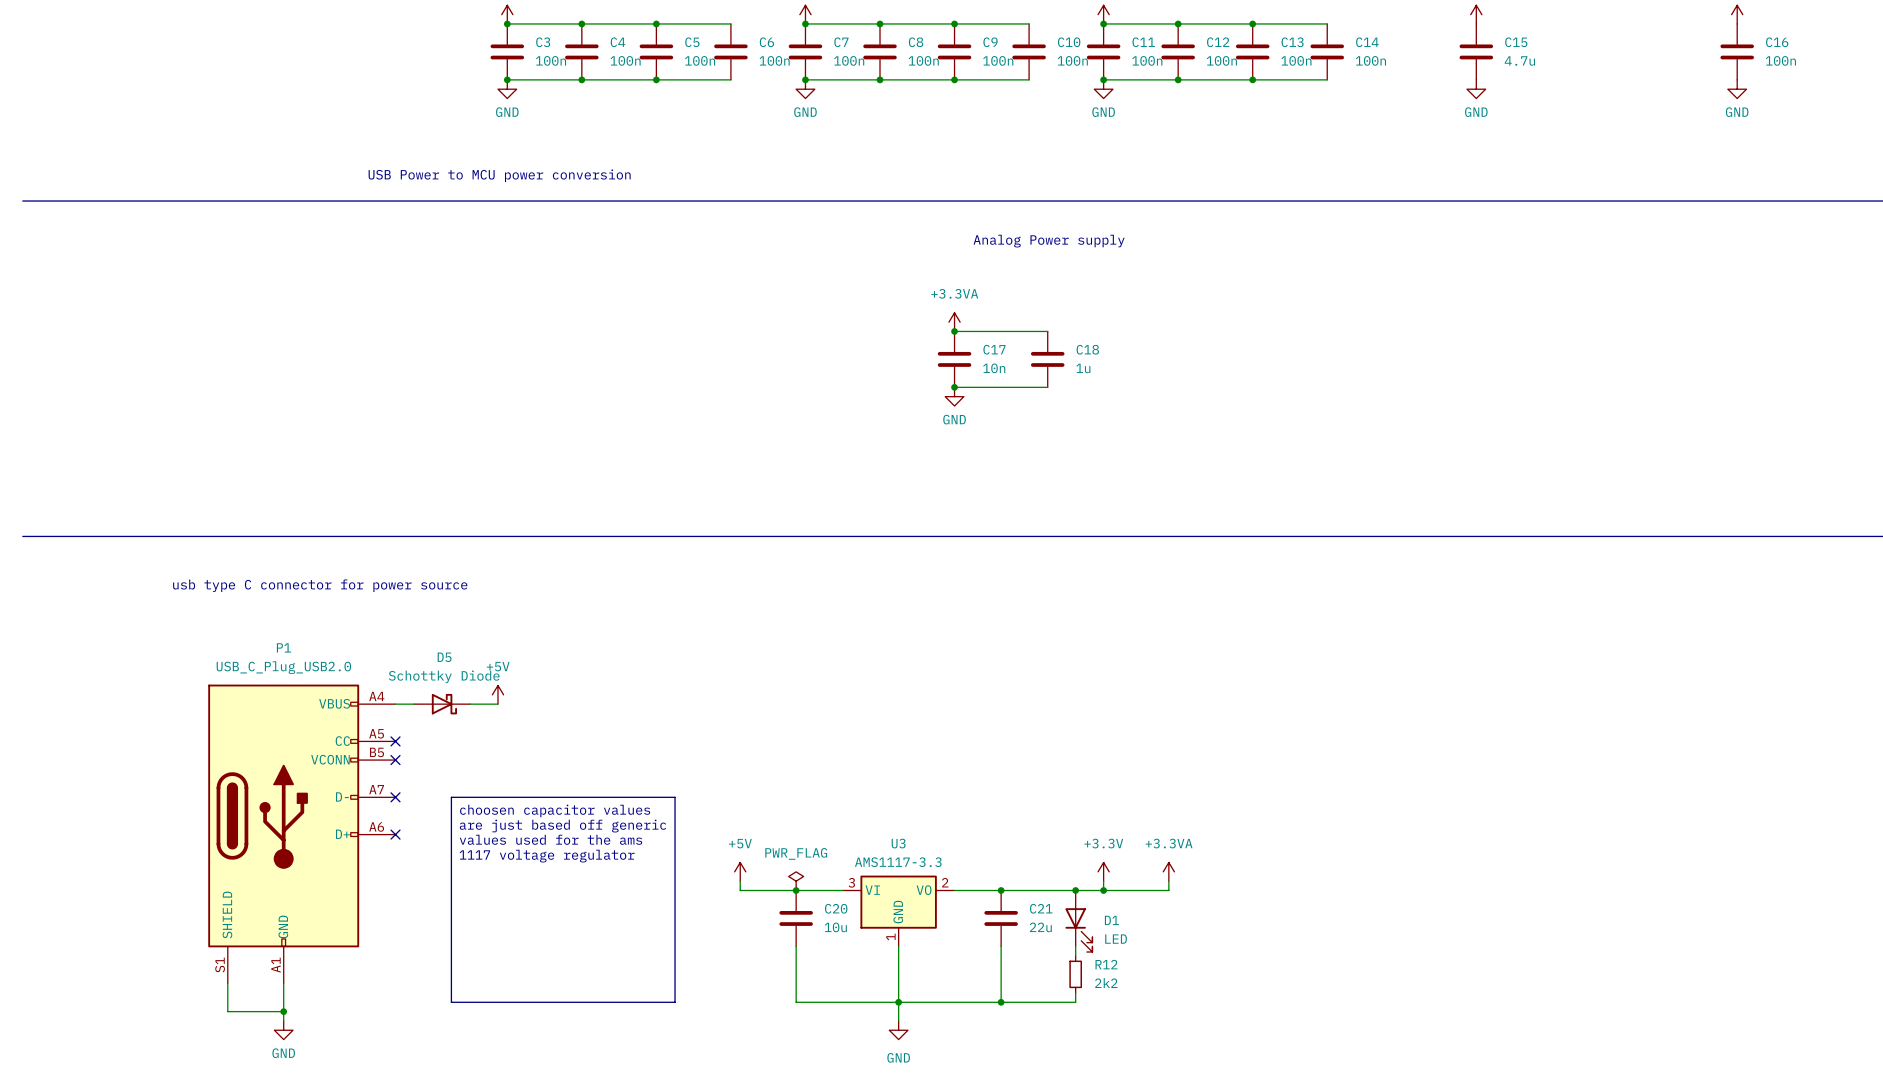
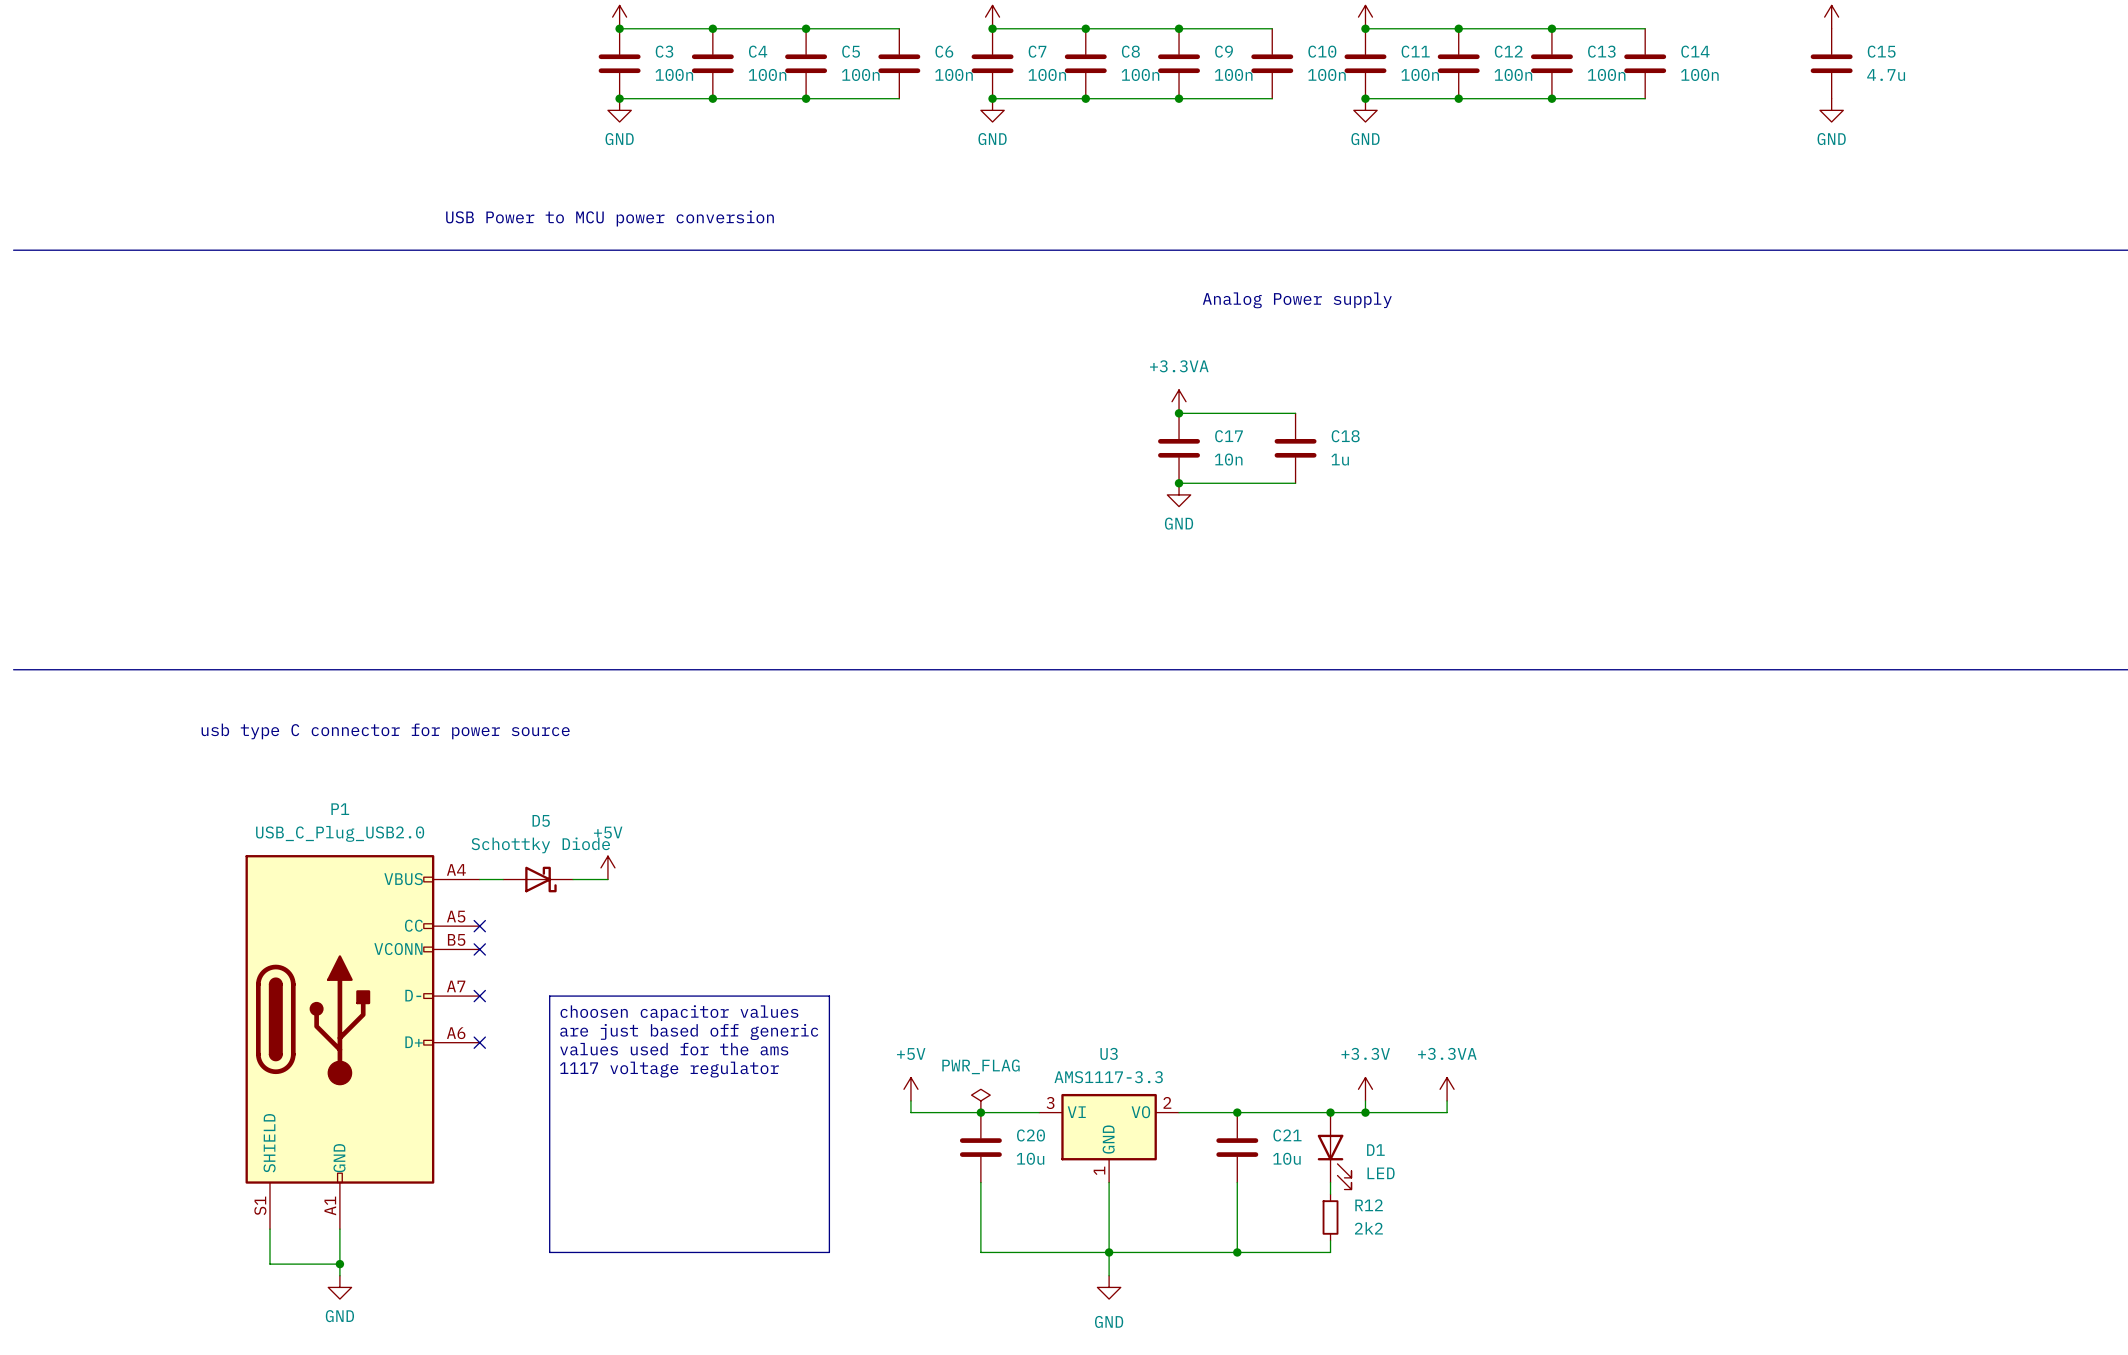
C21 value: 22u (1040, 927) -> 10u (1286, 1158)

